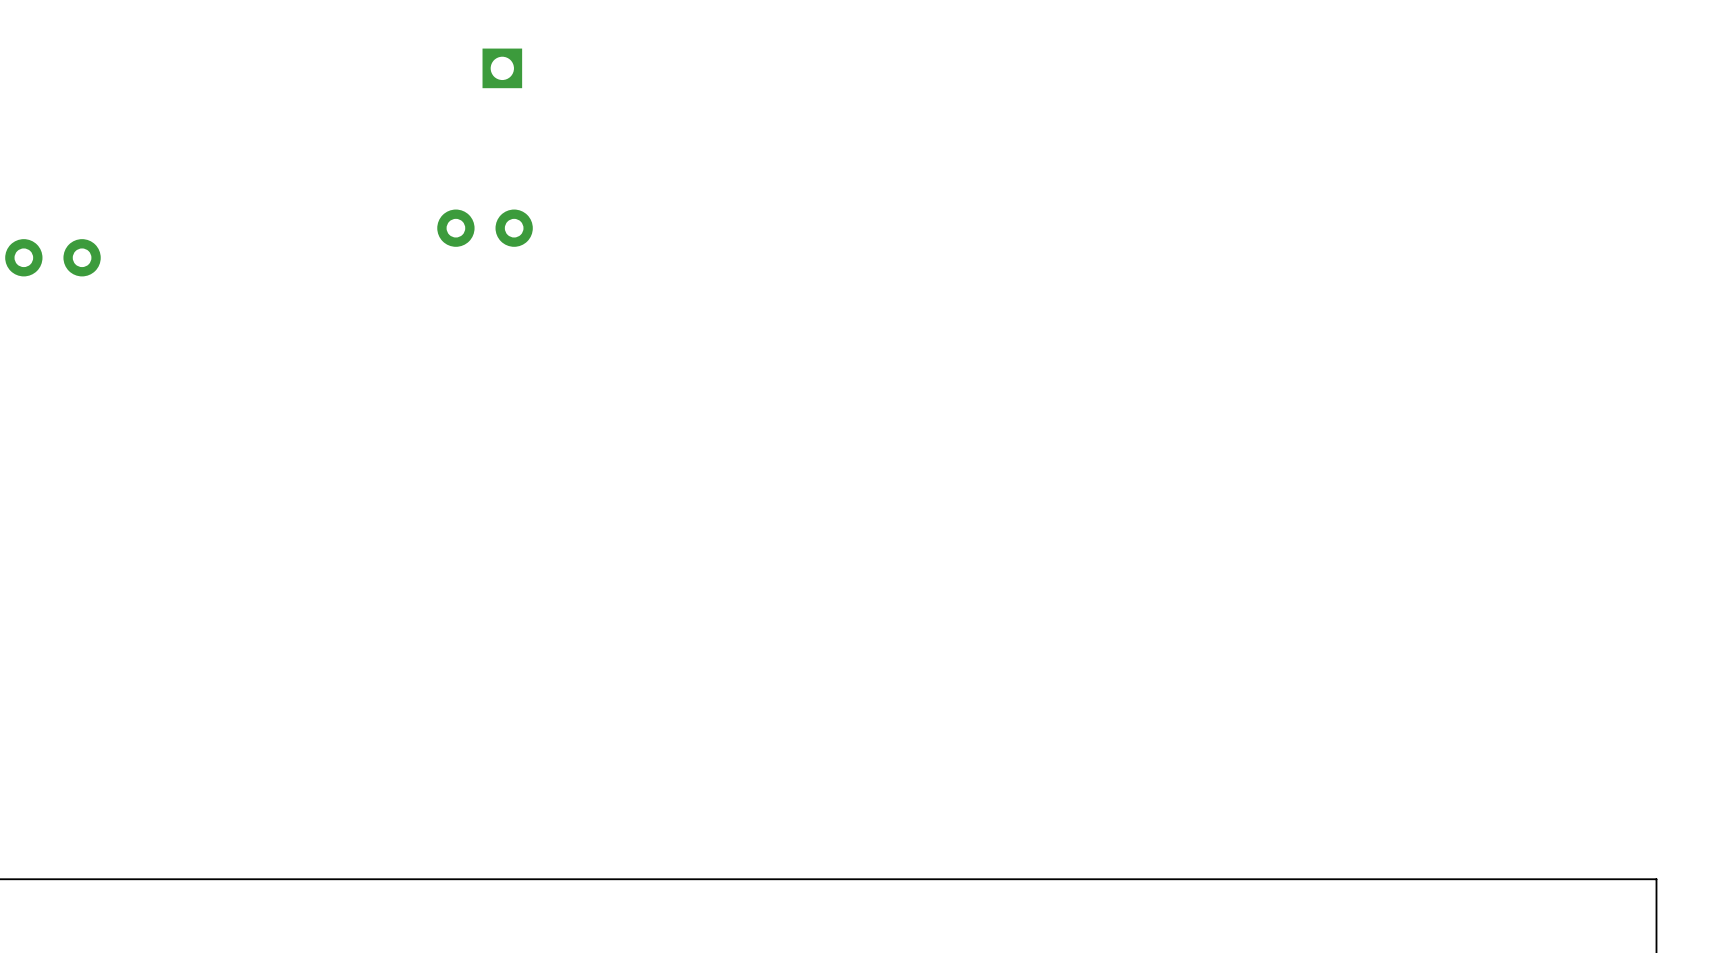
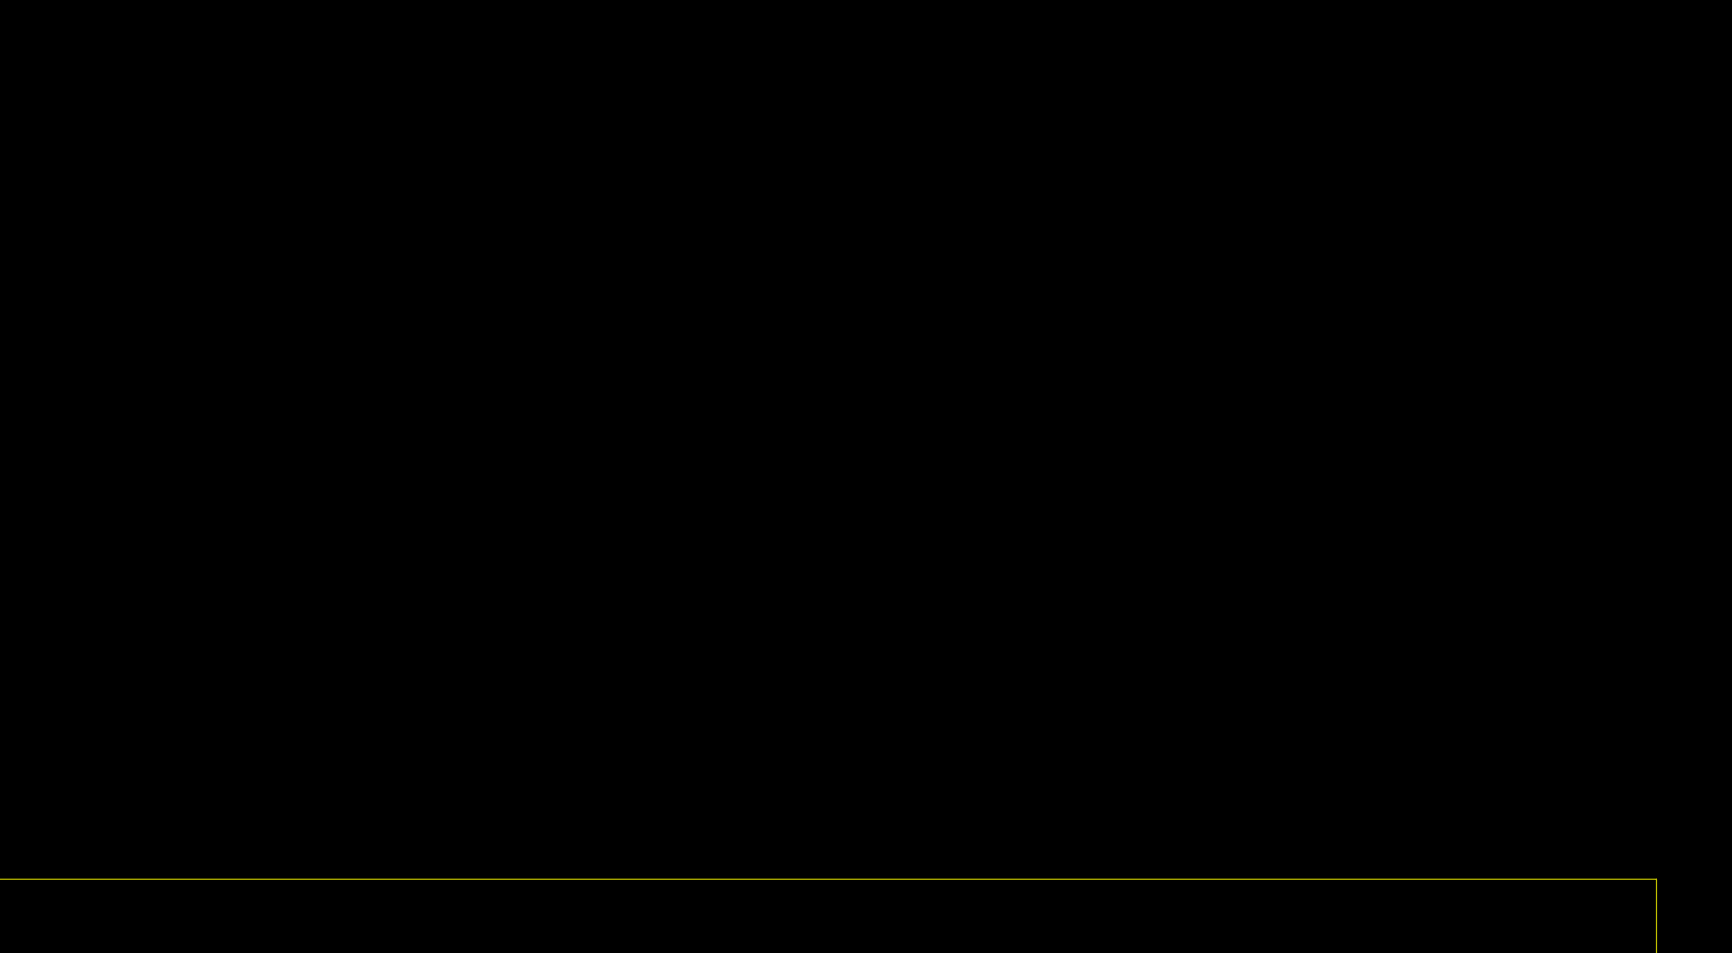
part: (502, 68) -> none
part: (485, 228) -> none
part: (52, 257) -> none

